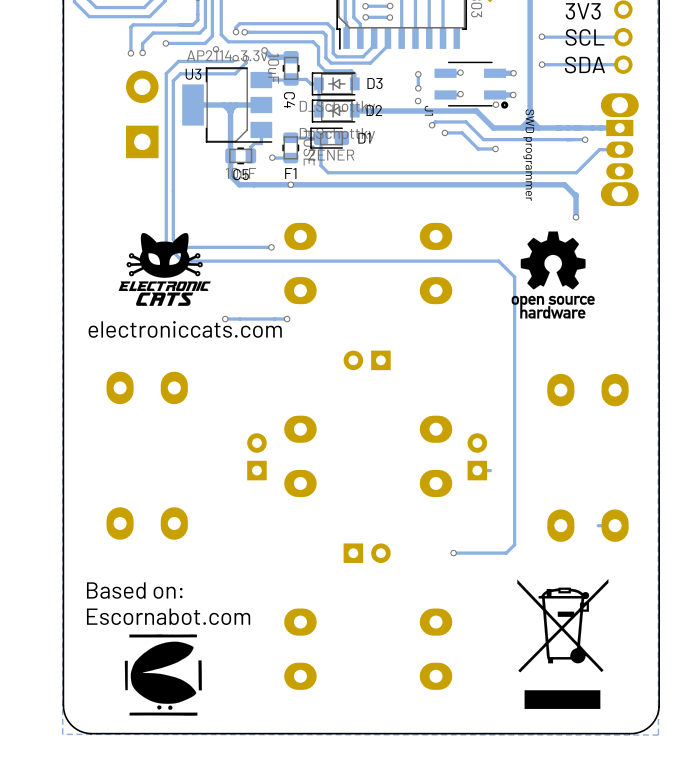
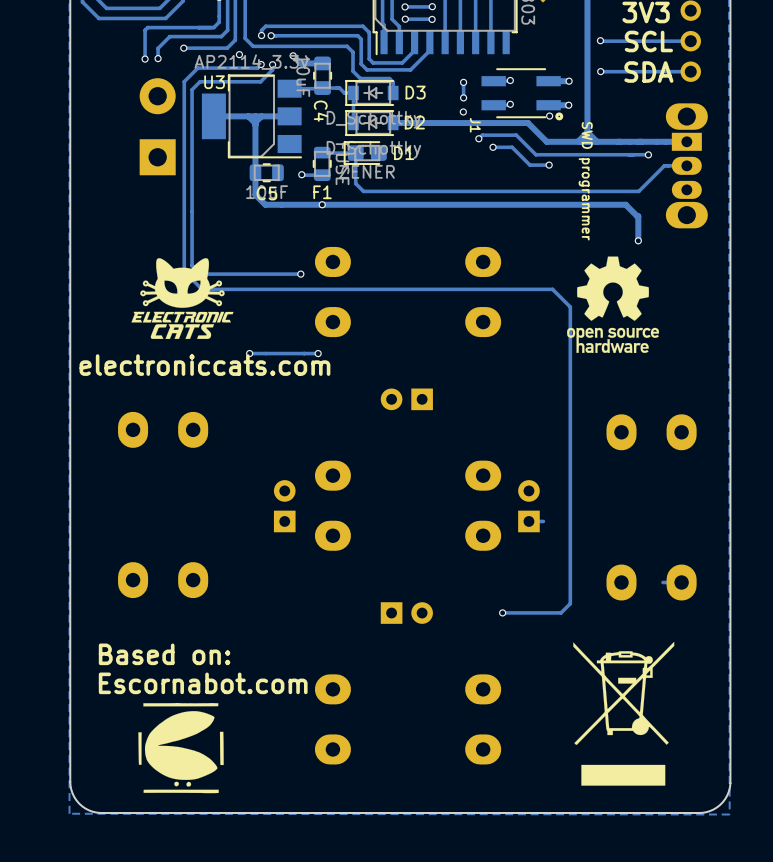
track: (261, 129) (261, 143) (254, 143) (250, 147) (250, 155) -> none

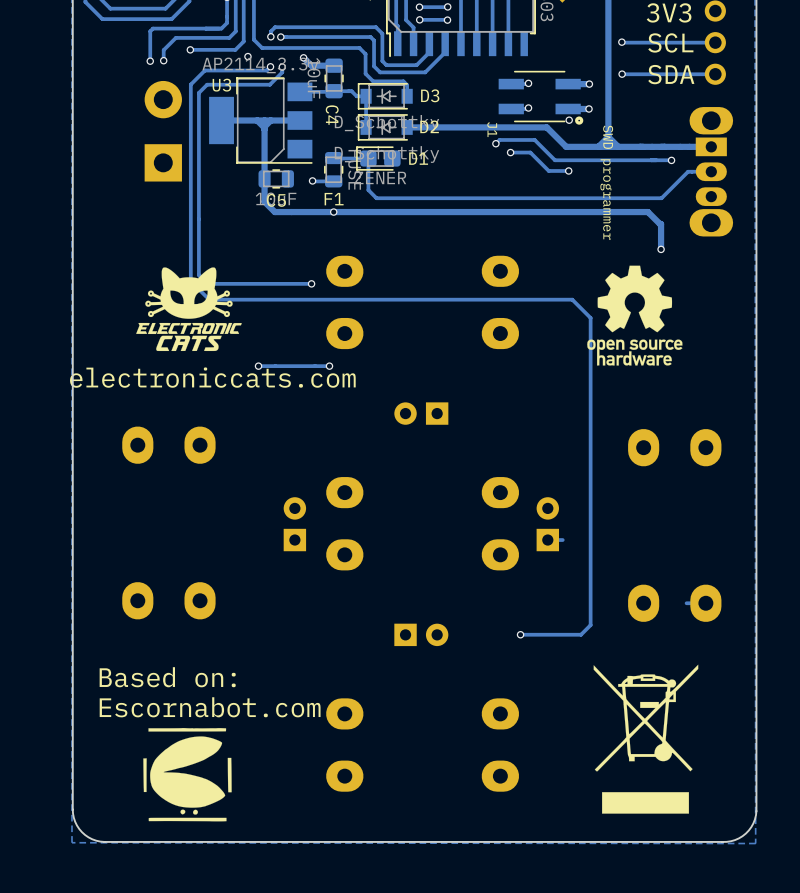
track: (463, 82) (463, 97) -> none
via: (463, 82) -> none
via: (463, 97) -> none
via: (463, 111) -> none

